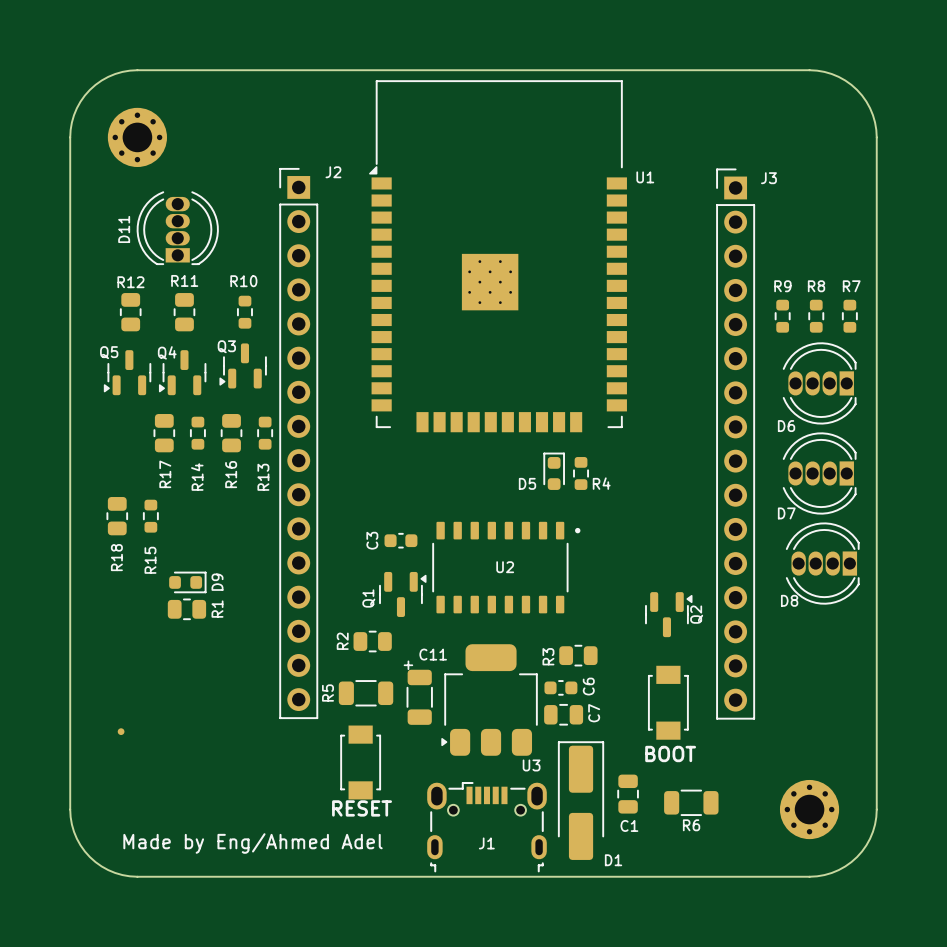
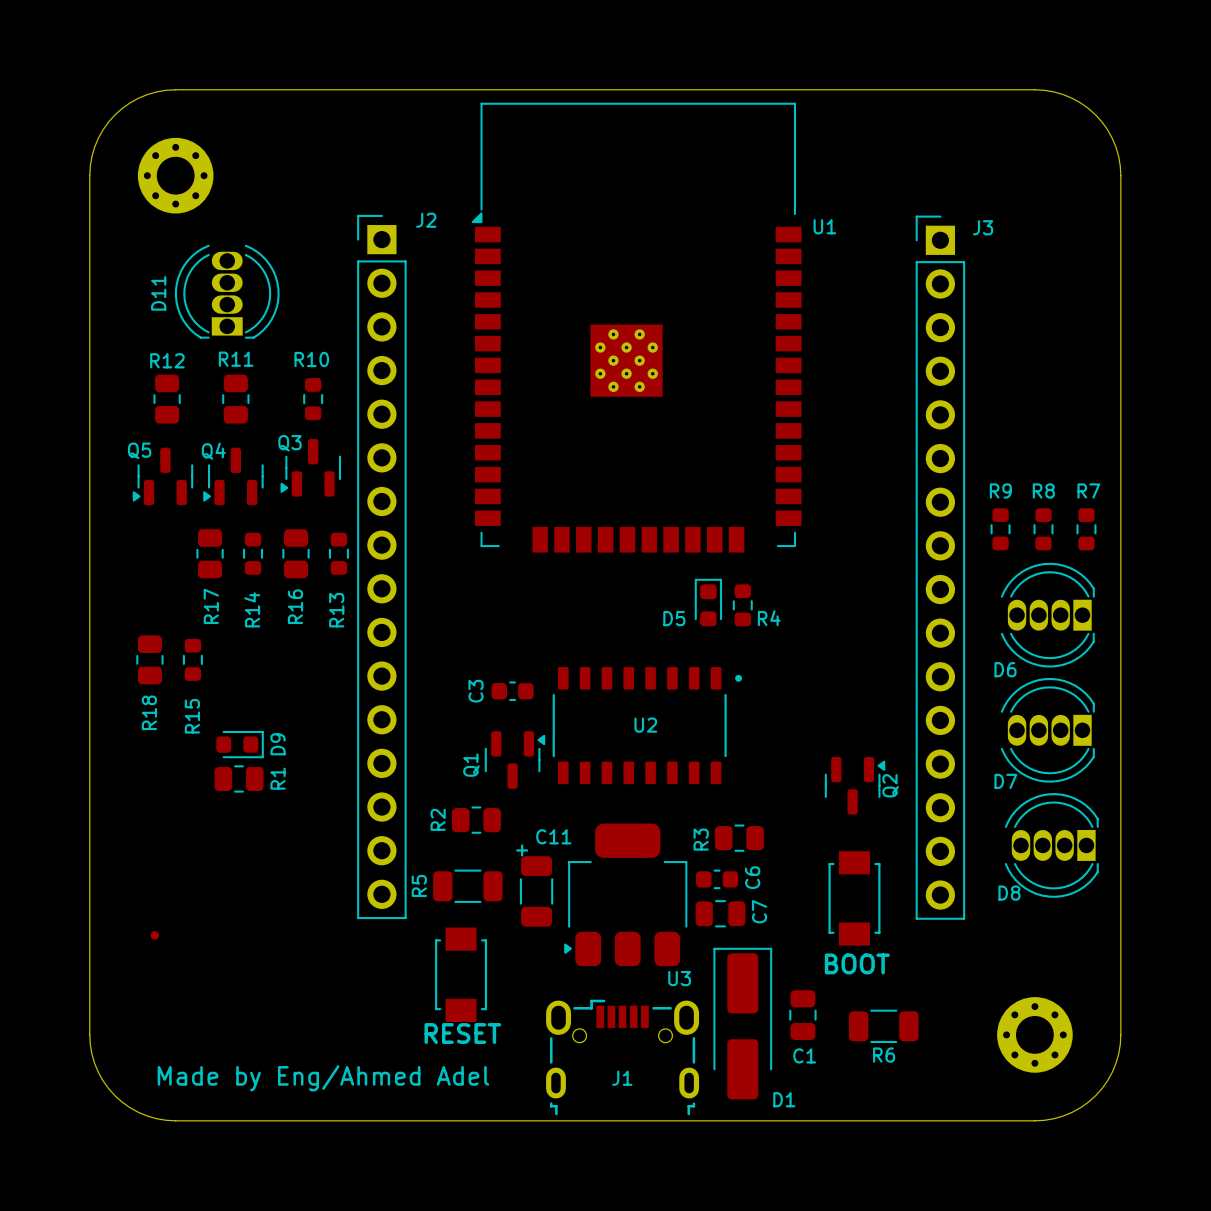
R9 position: (782, 316) -> (1000, 529)
R8 position: (816, 316) -> (1043, 529)
R7 position: (849, 316) -> (1086, 529)
D6 position: (819, 383) -> (1047, 615)
D7 position: (819, 473) -> (1047, 730)
D8 position: (822, 563) -> (1051, 845)

